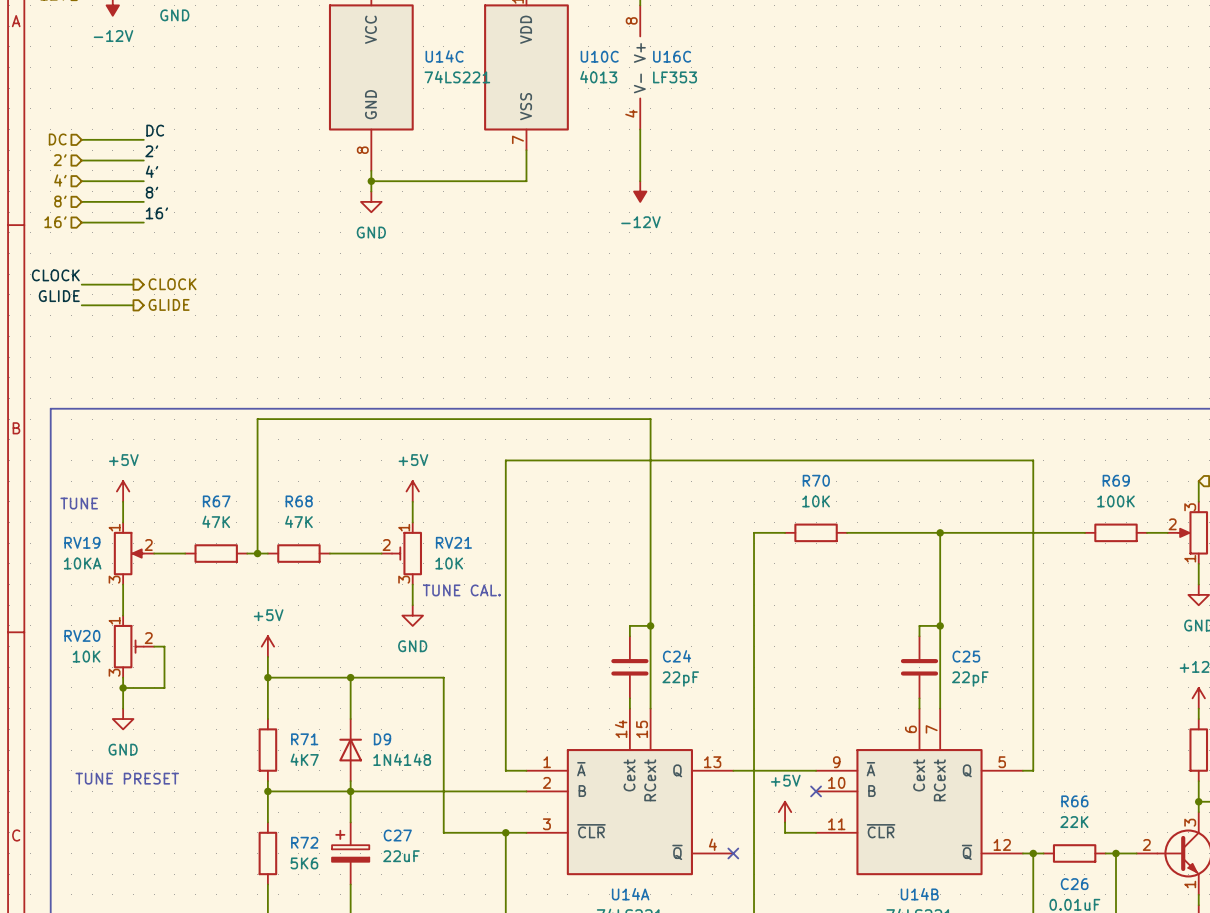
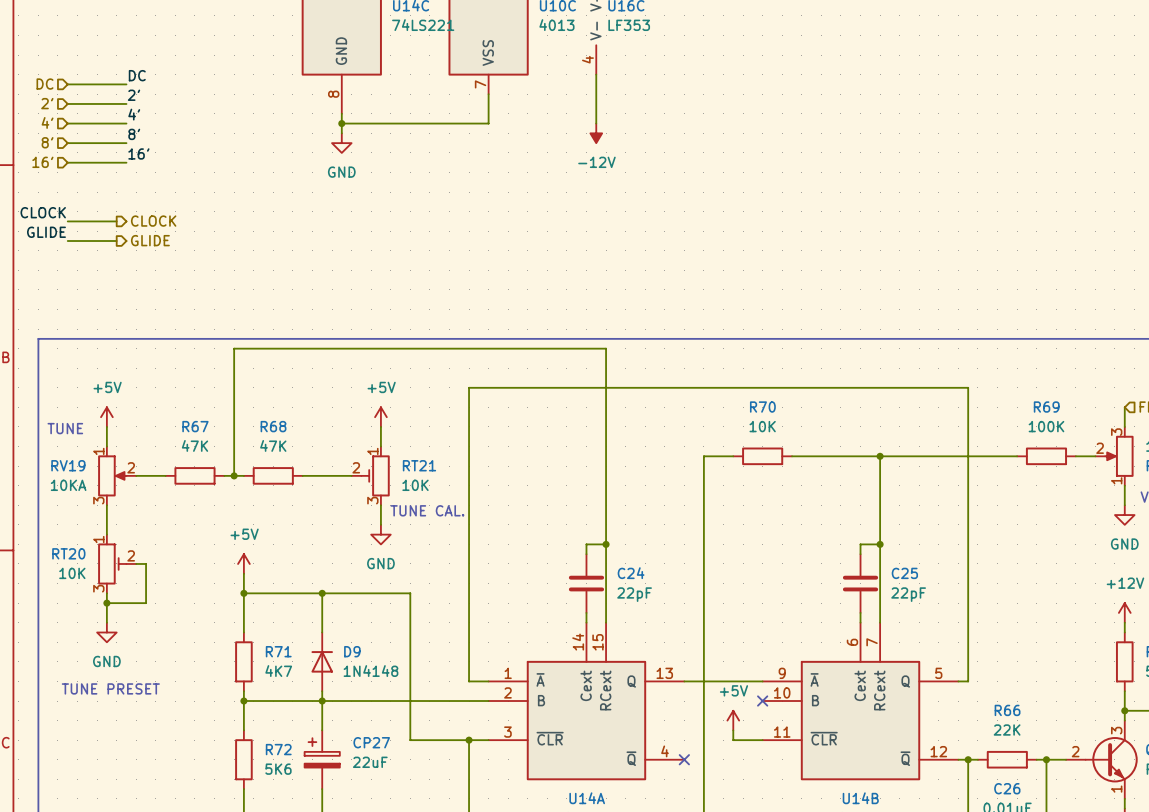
RV21 name: RV21 (453, 542) -> RT21 (419, 465)
RV20 name: RV20 (82, 635) -> RT20 (68, 553)
C27 name: C27 (397, 835) -> CP27 (371, 742)

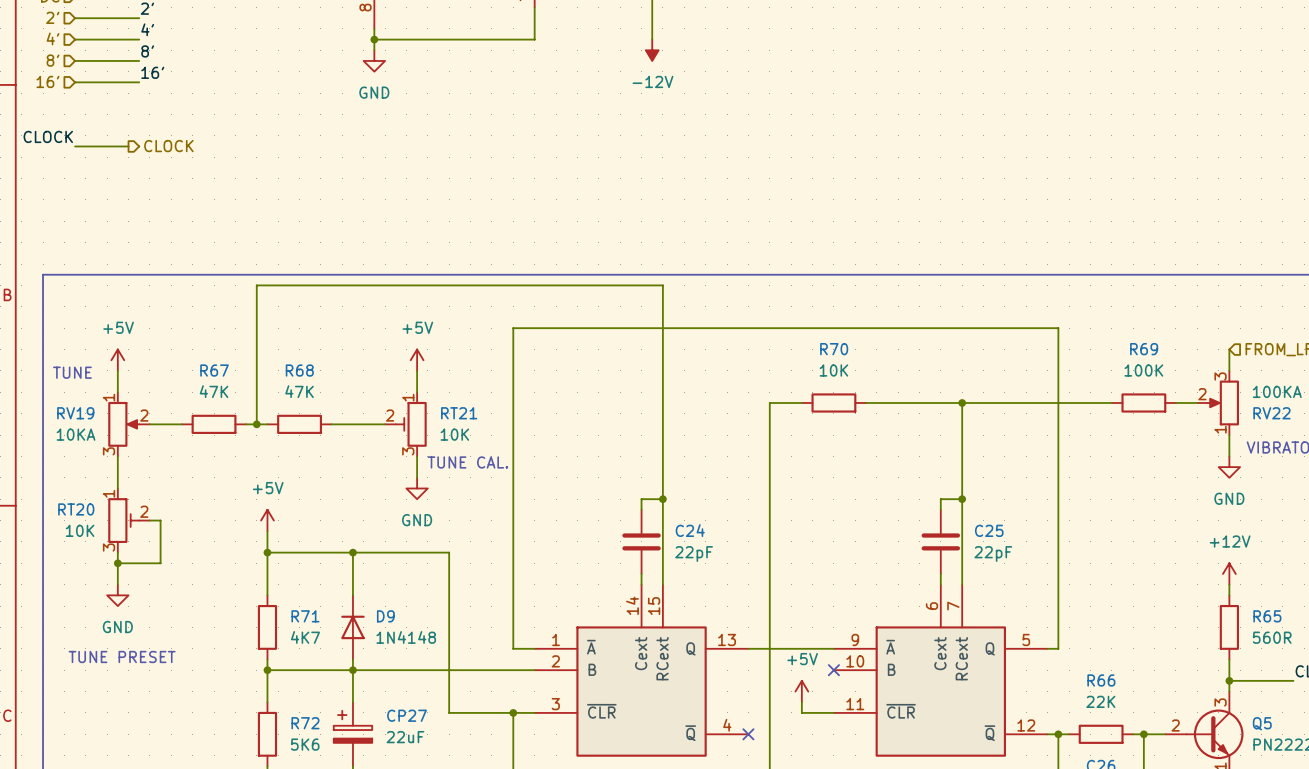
label: GLIDE (46, 232) -> none
hierarchical label: GLIDE (150, 240) -> none
wire: (67, 241) (116, 241) -> none

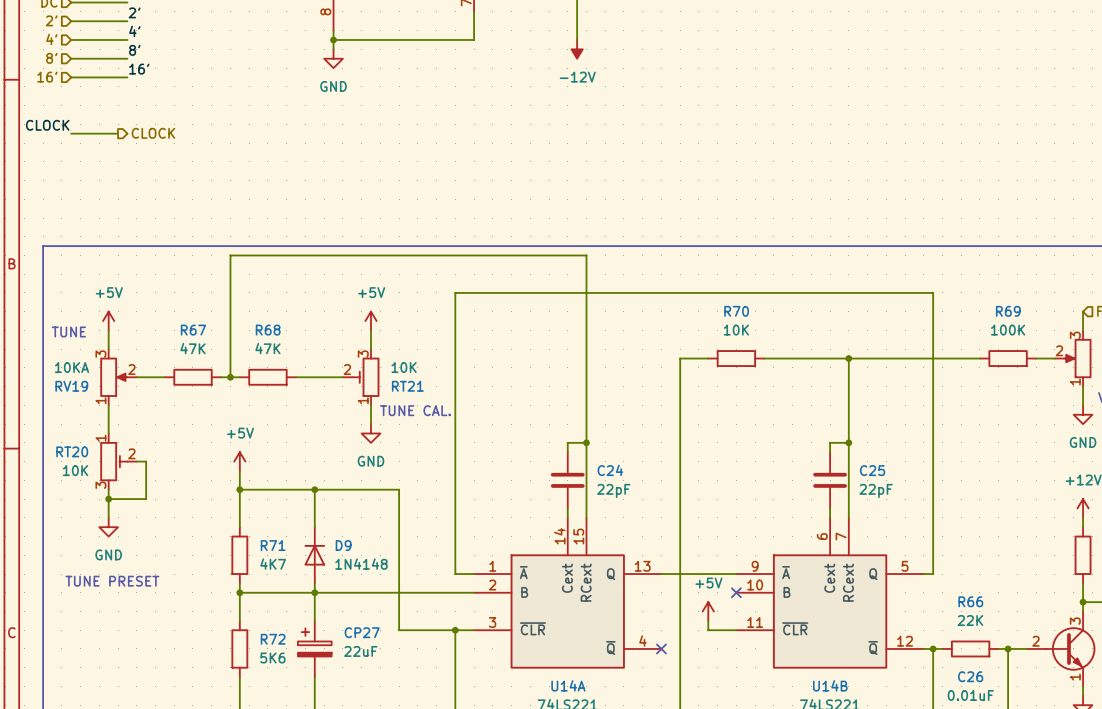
RV19 flip: as is (123, 424) -> up-down (113, 377)
RT21 flip: as is (411, 424) -> up-down (365, 377)

